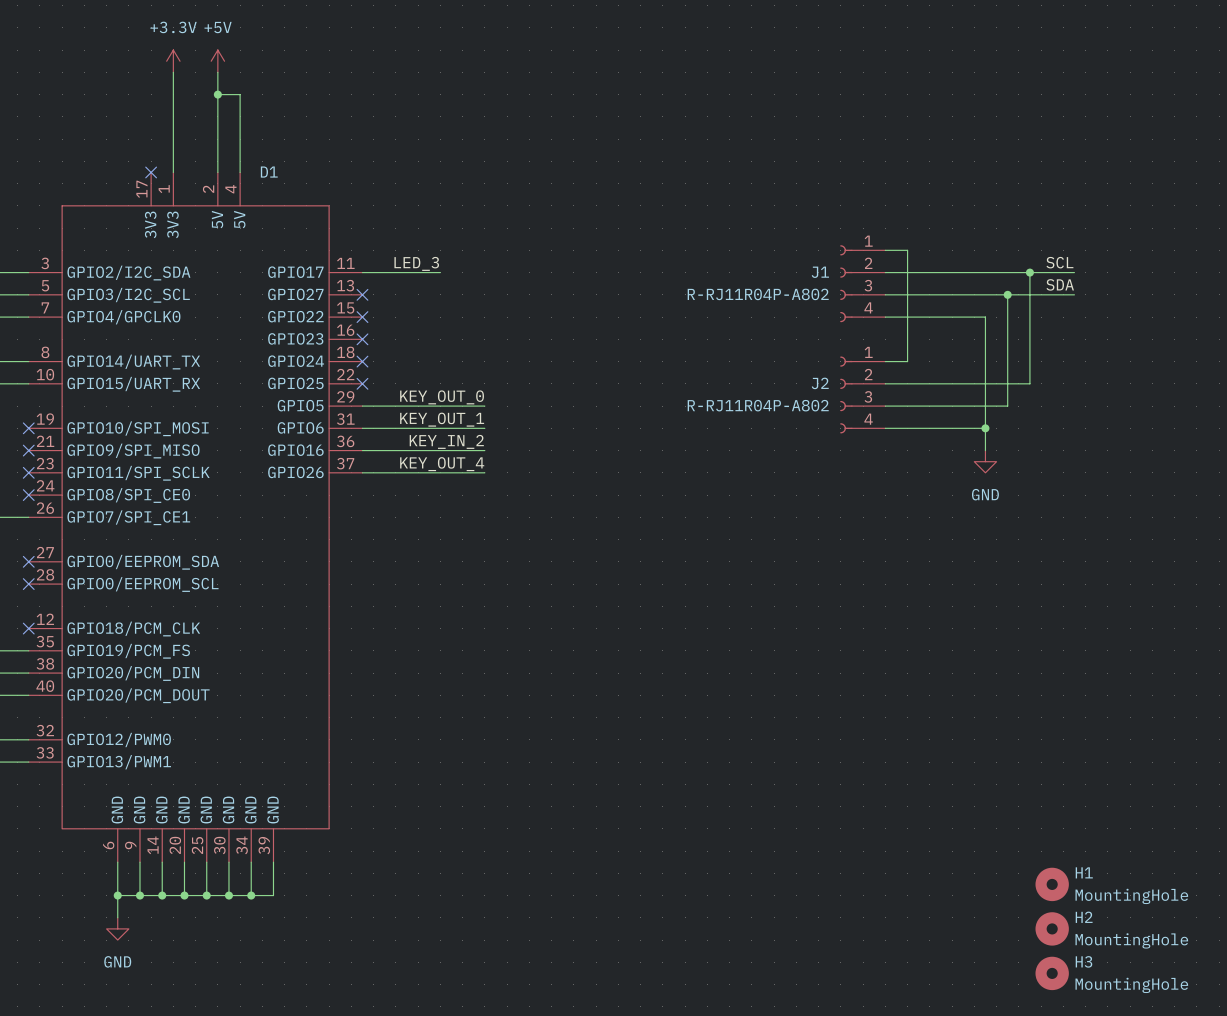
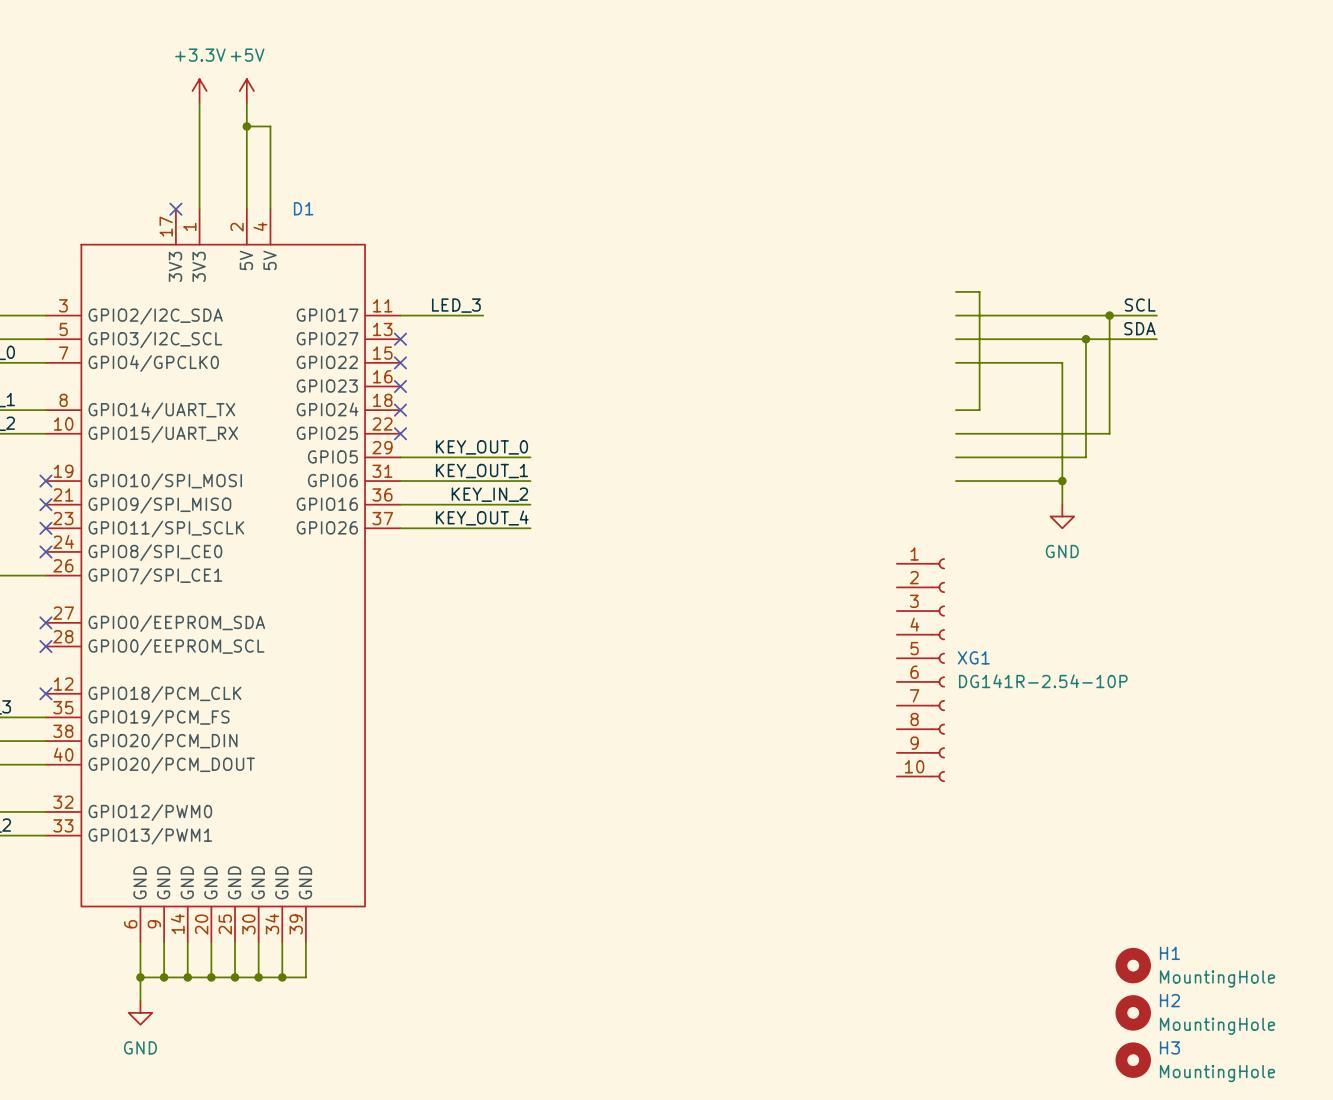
J1: R-RJ11R04P-A802 (862, 283) -> none
J2: R-RJ11R04P-A802 (862, 394) -> none
XG1: none -> DG141R-2.54-10P (920, 670)

